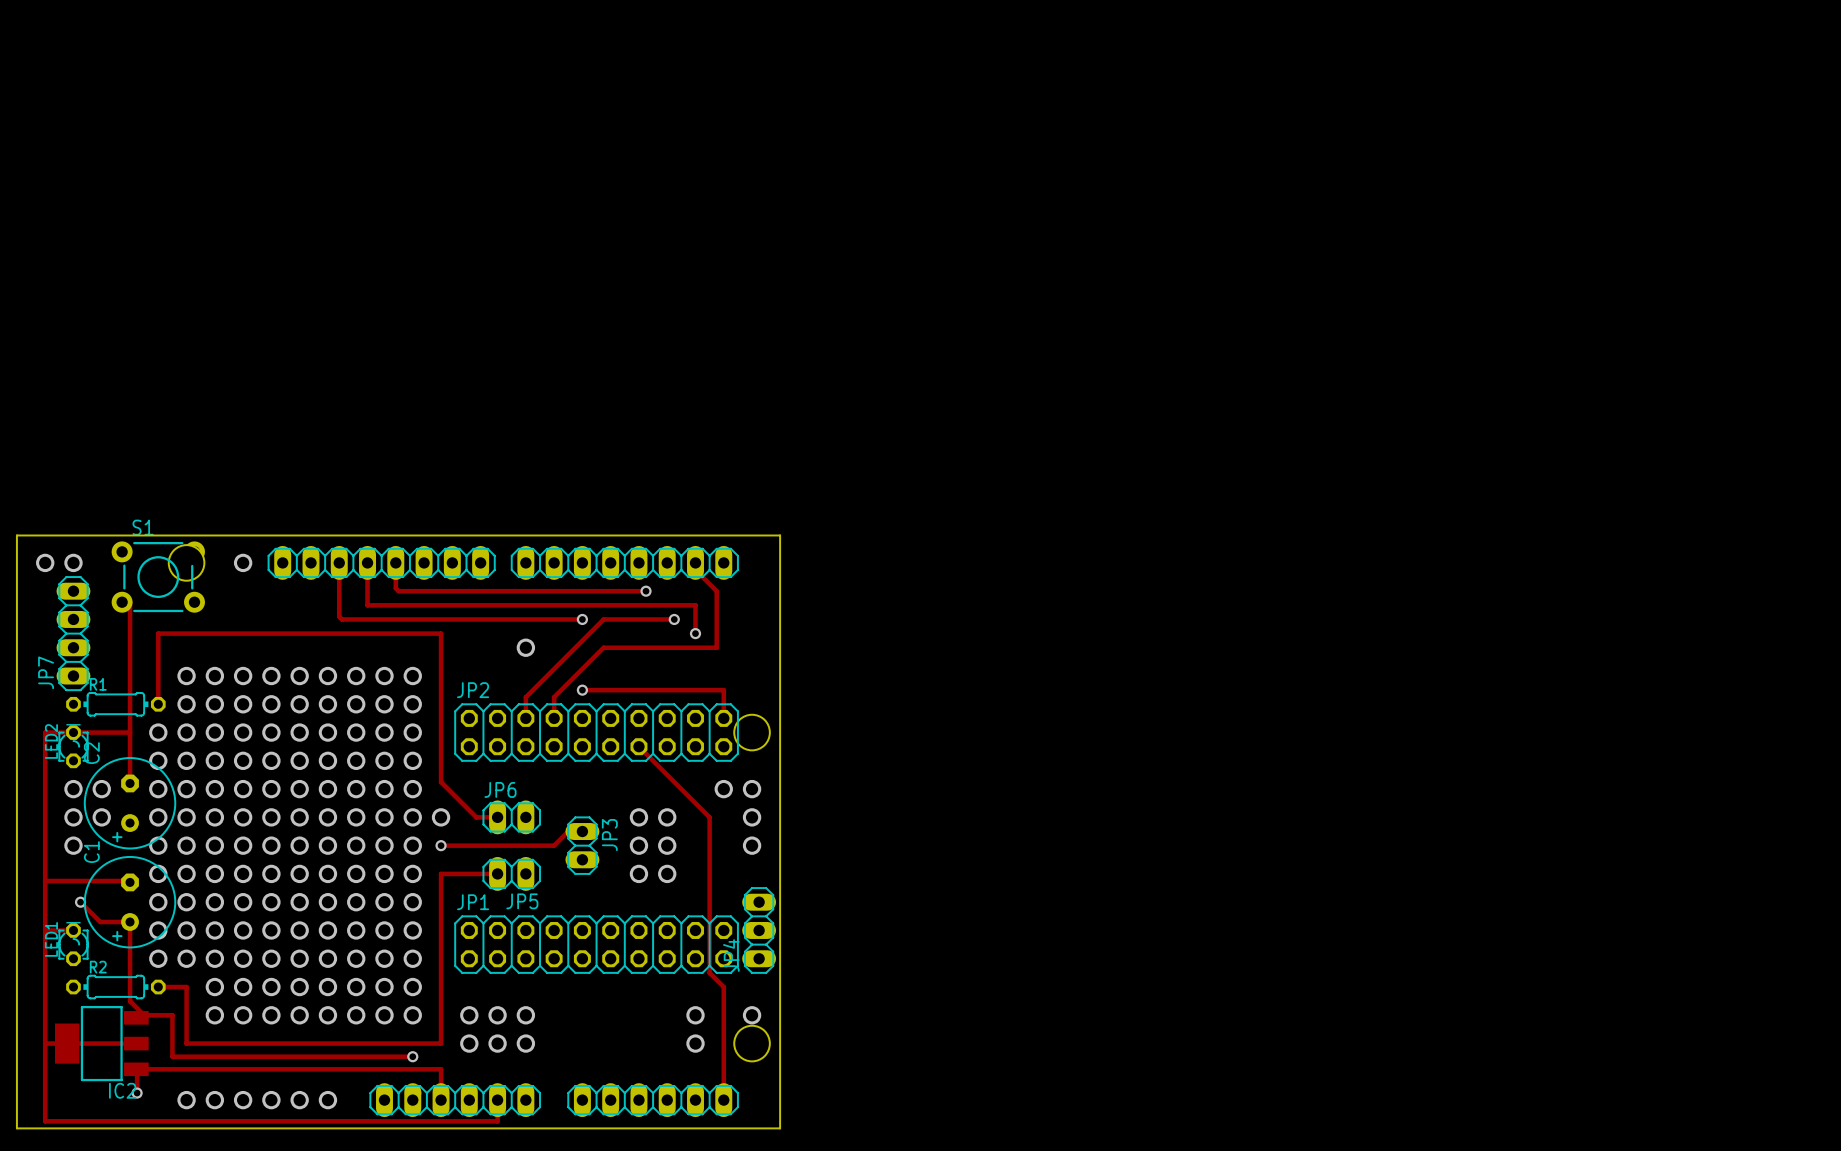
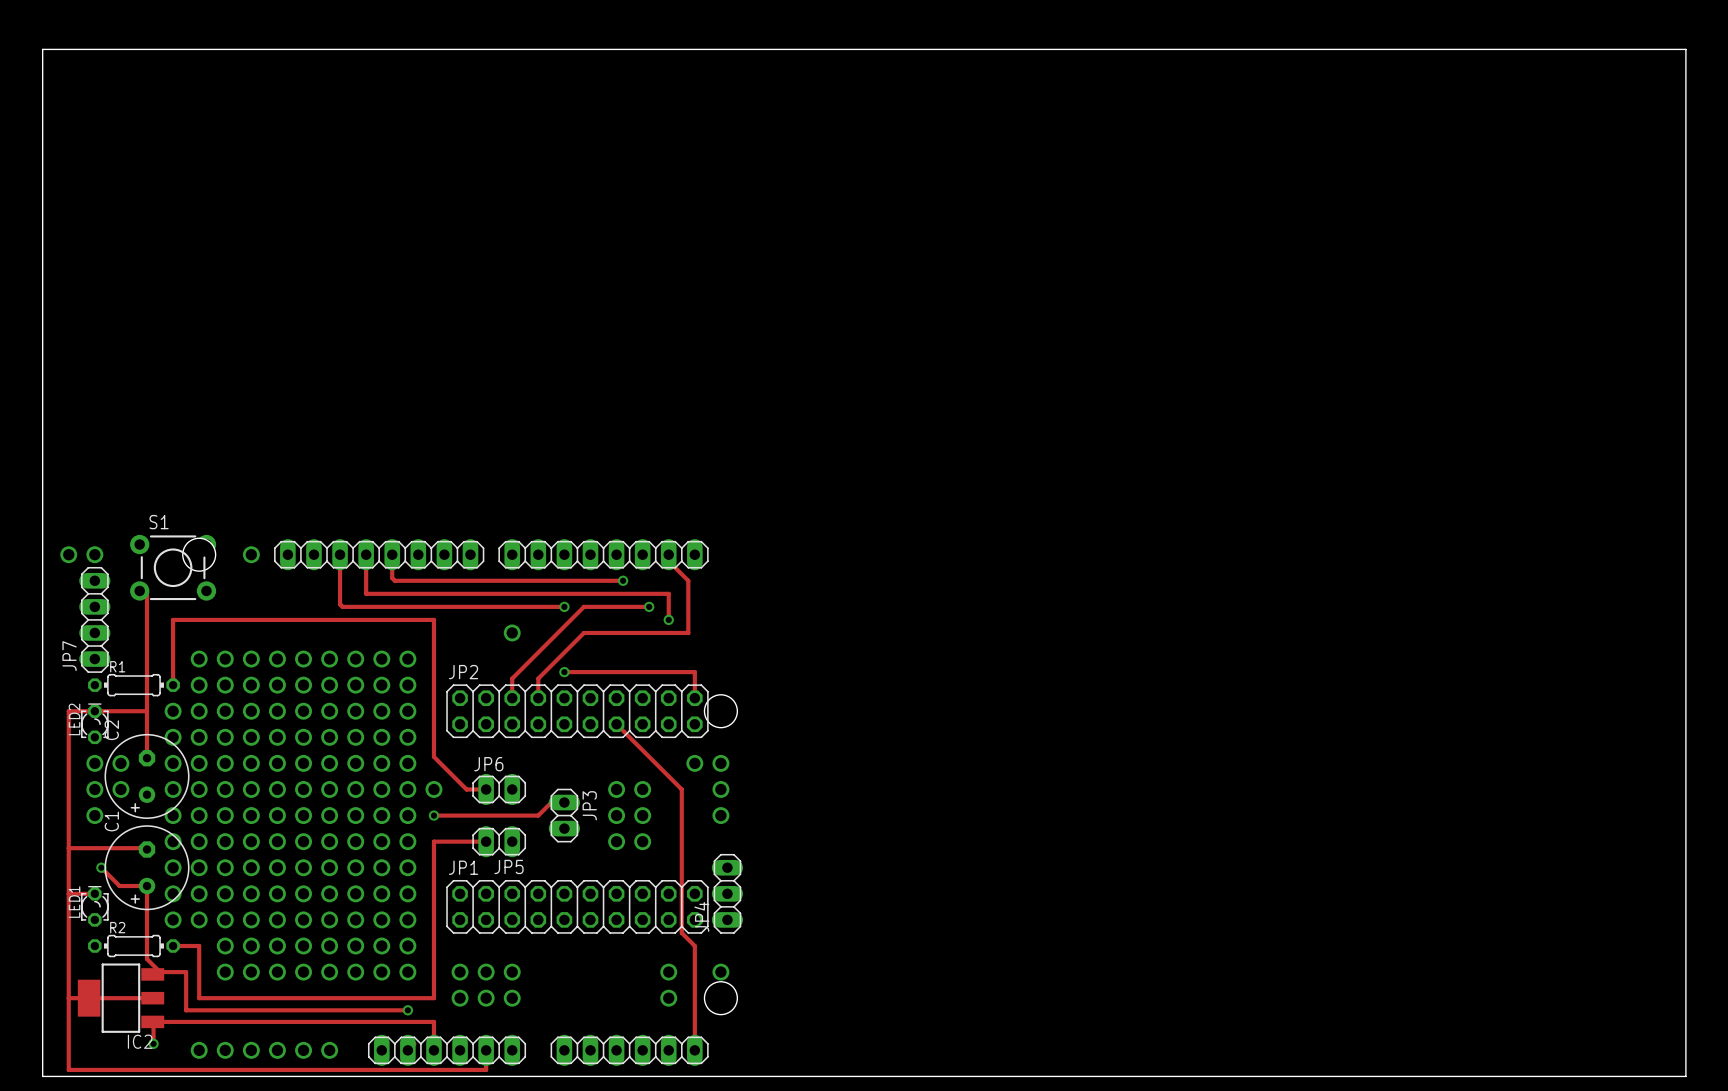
board edge: (16, 535) (780, 535) (780, 1128) -> (42, 529) (42, 49) (1685, 49) (1685, 1076) (746, 1076)

